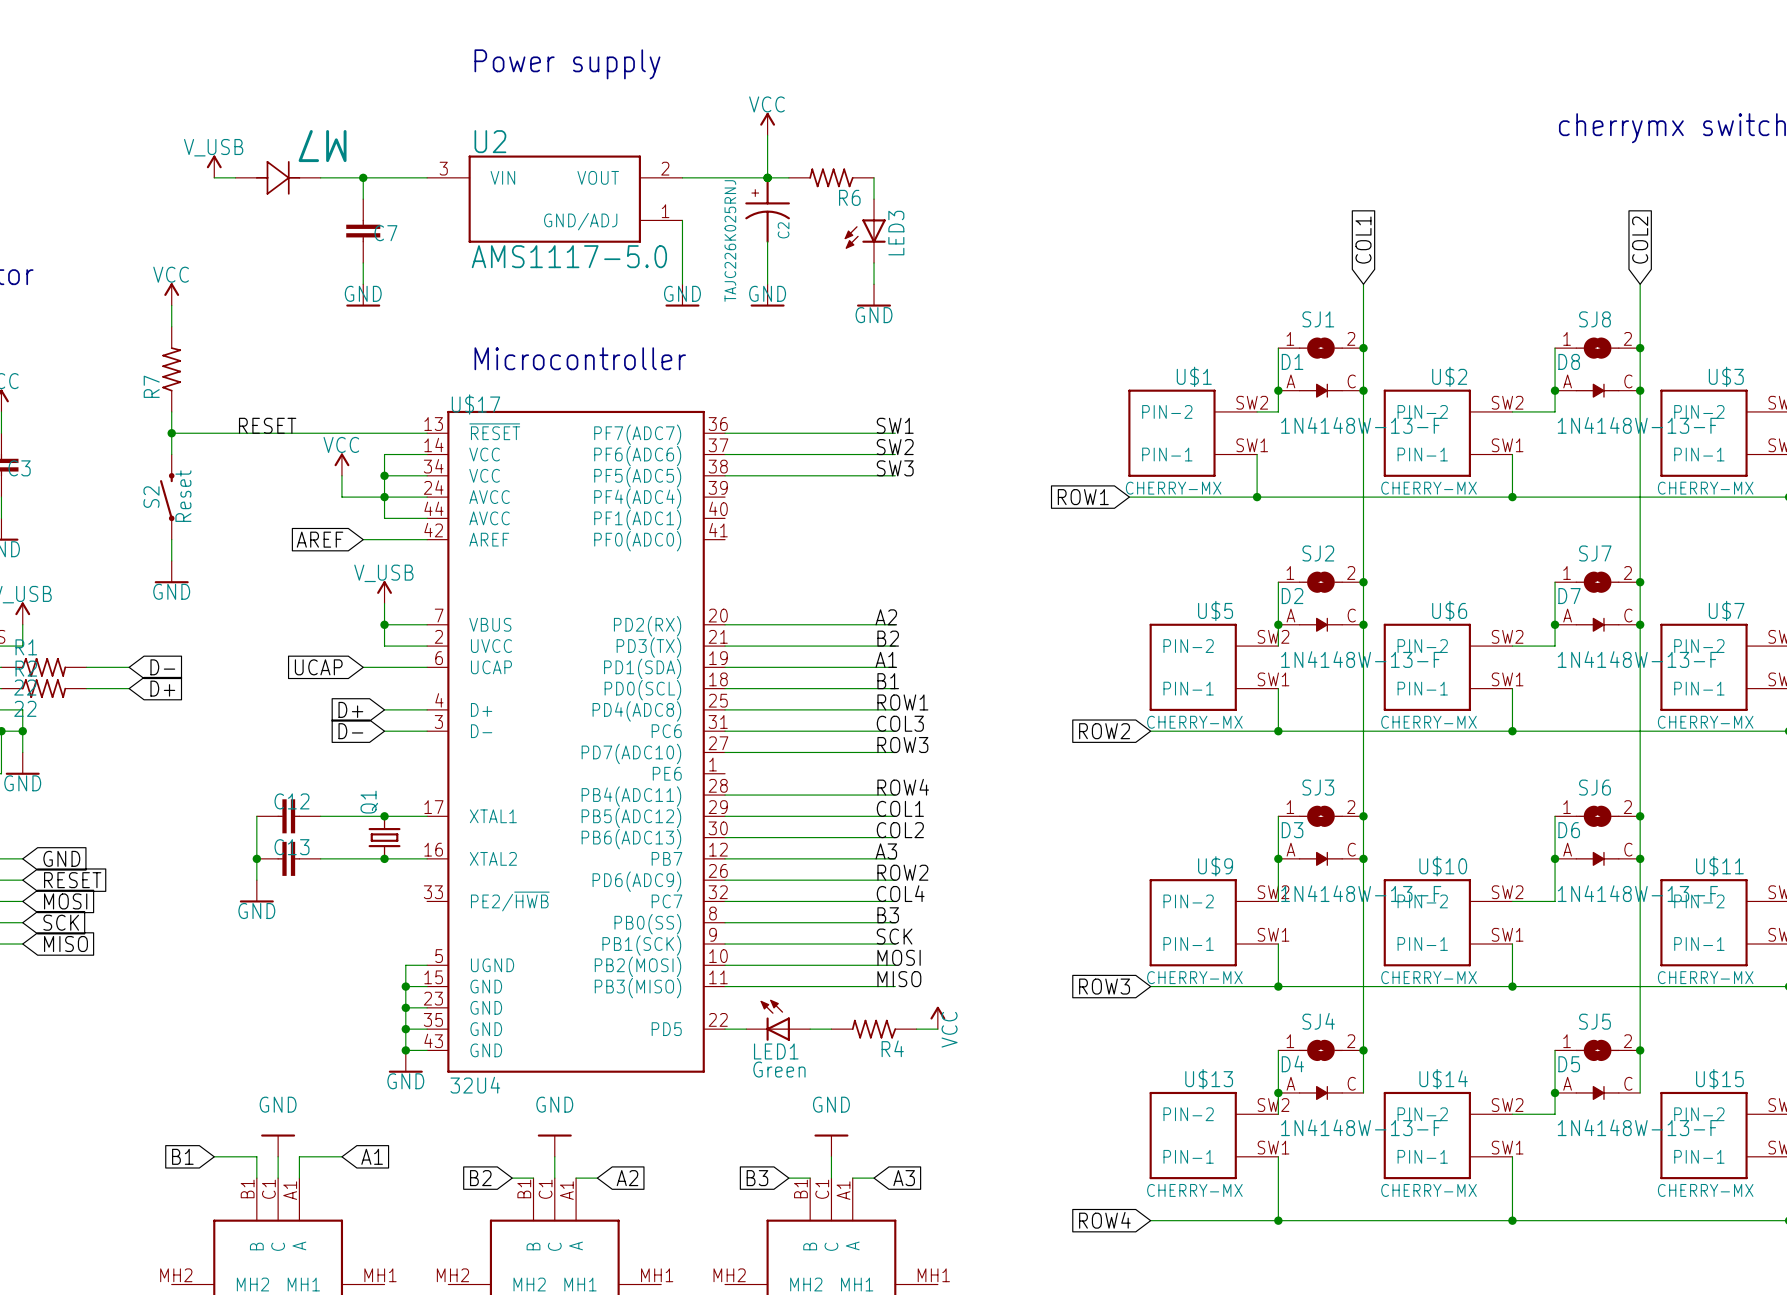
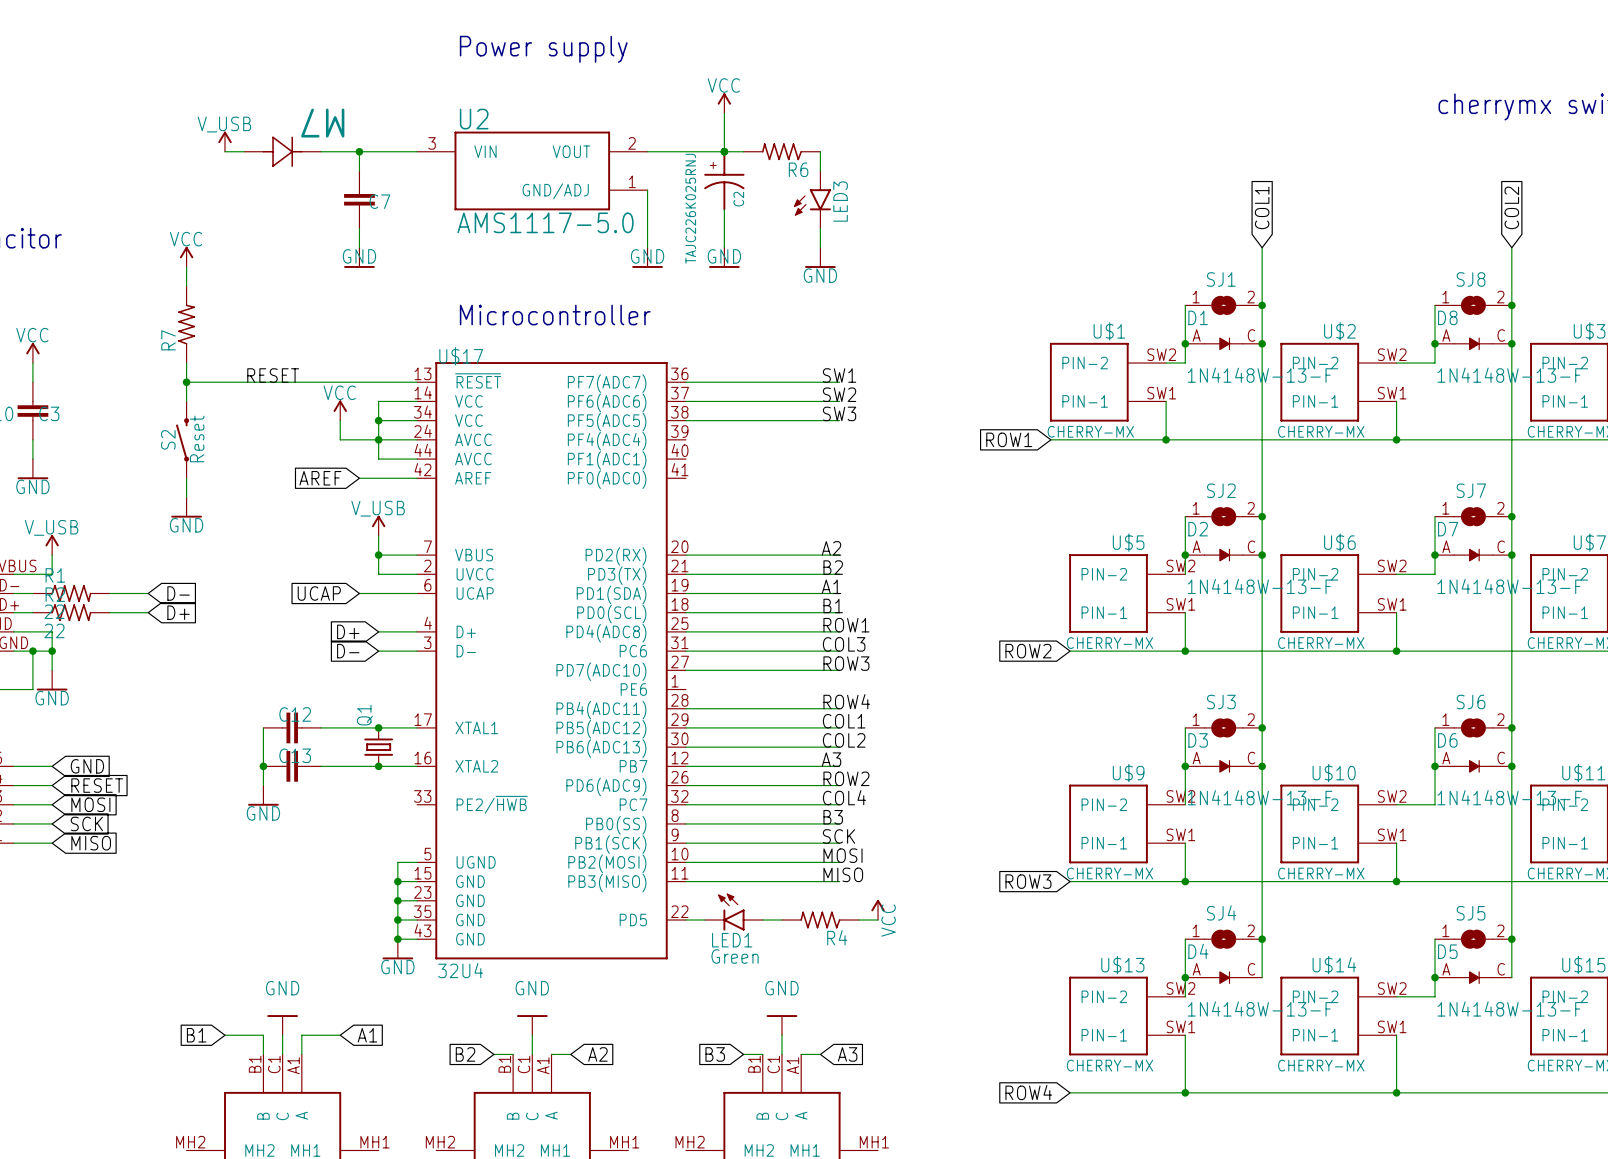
LED3 symbol: [844, 199, 886, 263] -> [793, 170, 831, 229]
LED1 symbol: [746, 999, 811, 1041] -> [705, 893, 763, 931]

